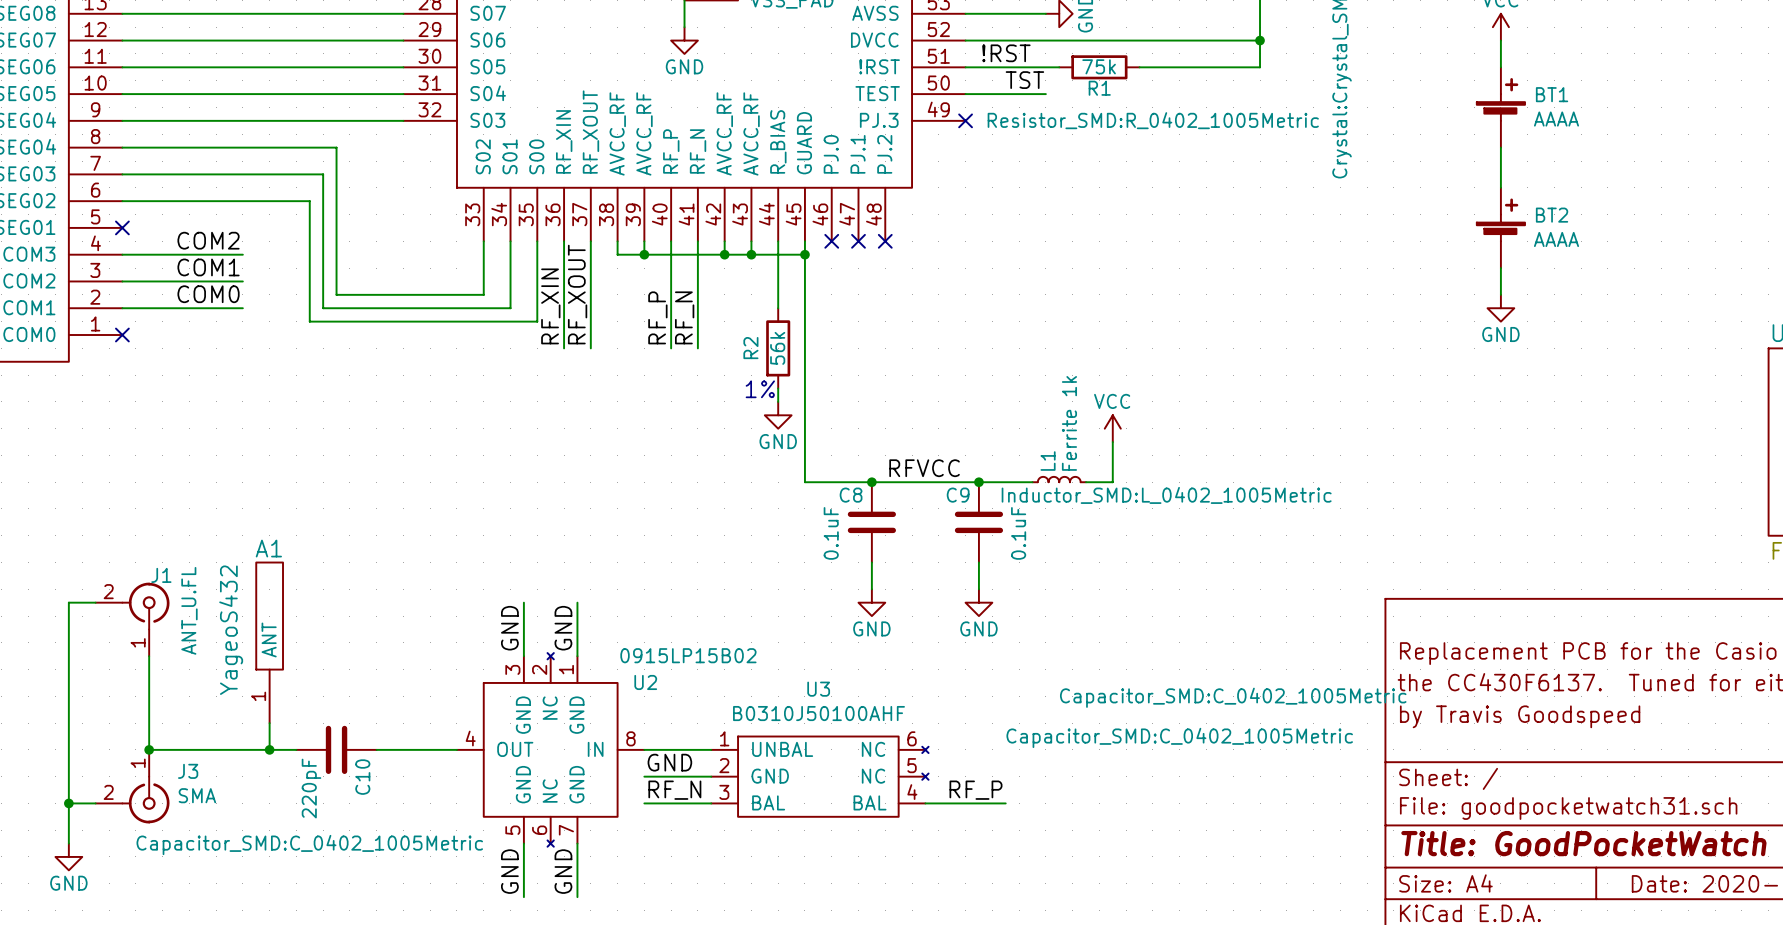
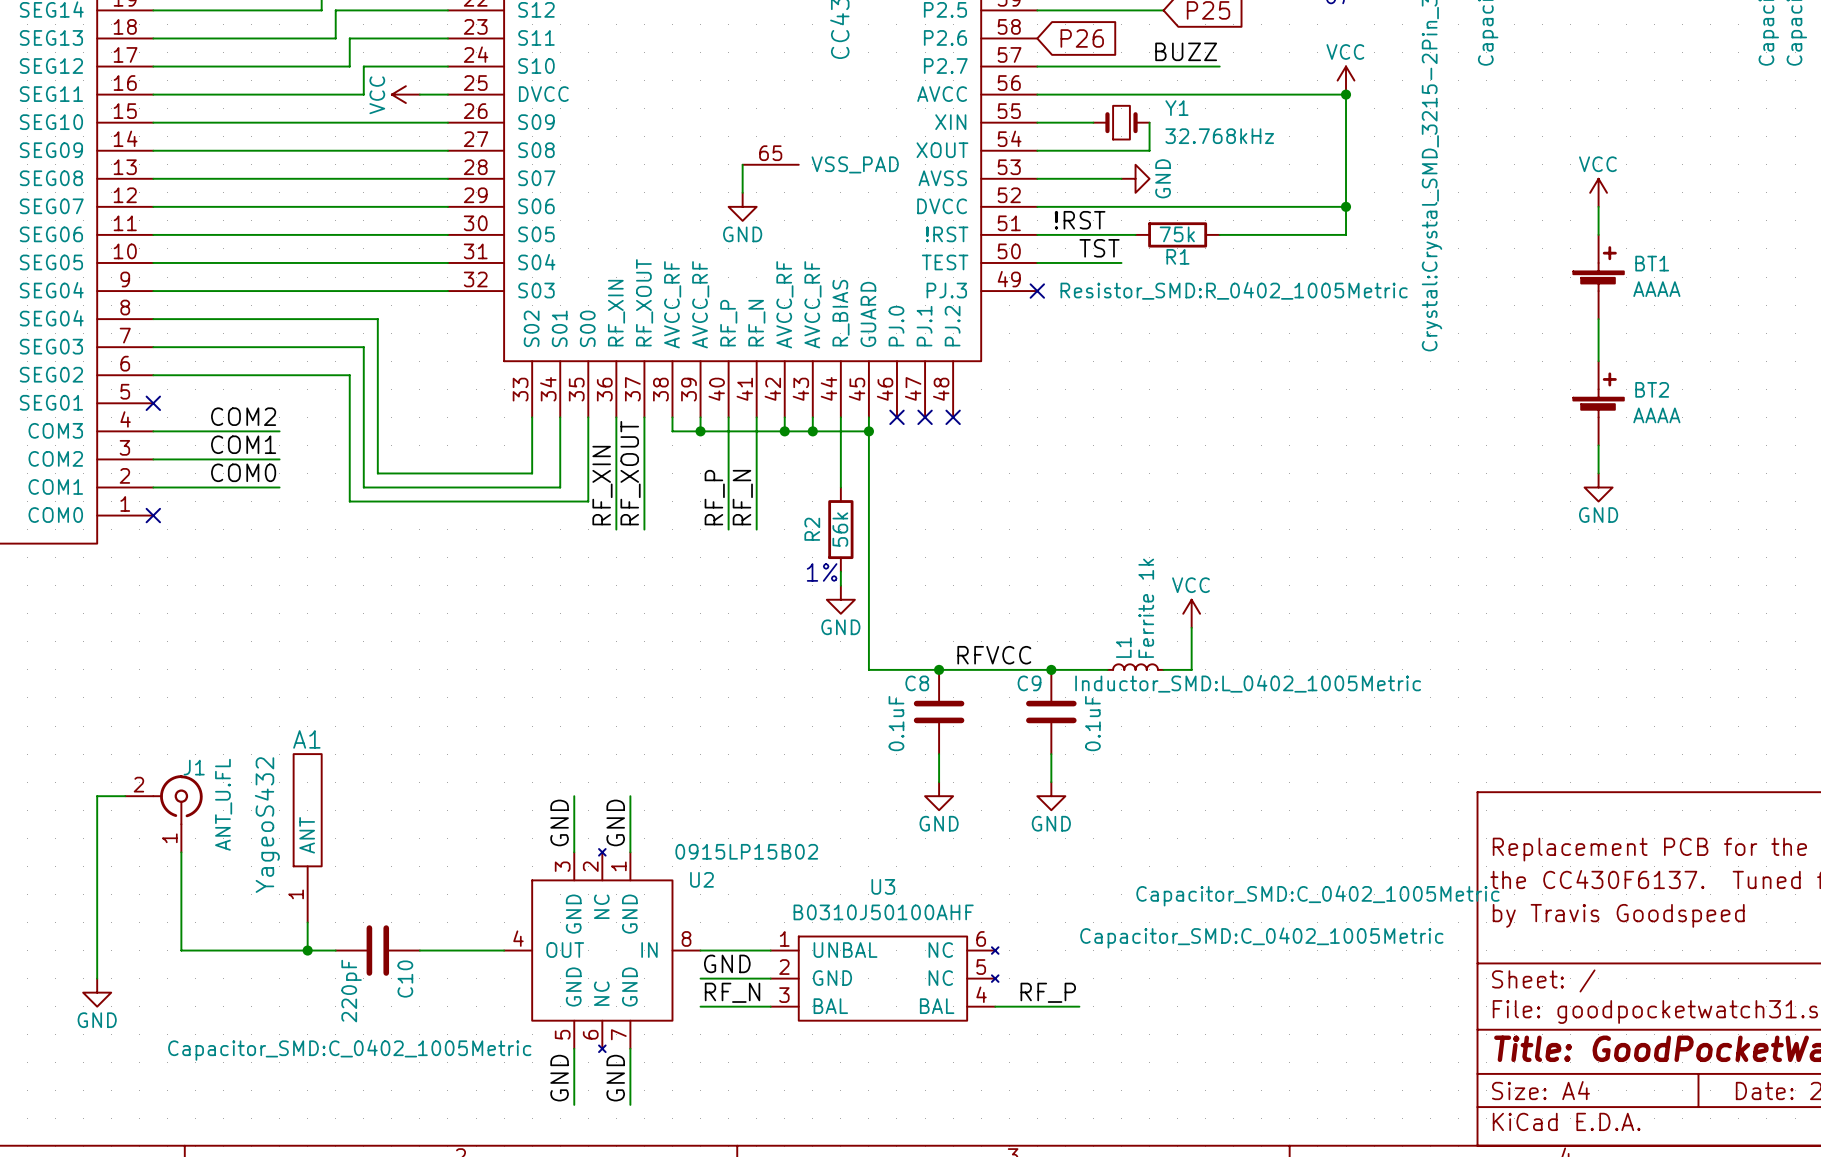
junction: (149, 749) -> none
wire: (68, 776) (68, 843) -> none
J3: SMA (132, 786) -> none
wire: (68, 803) (95, 803) -> none
junction: (68, 803) -> none
power symbol position: GND (68, 856) -> GND (97, 992)

